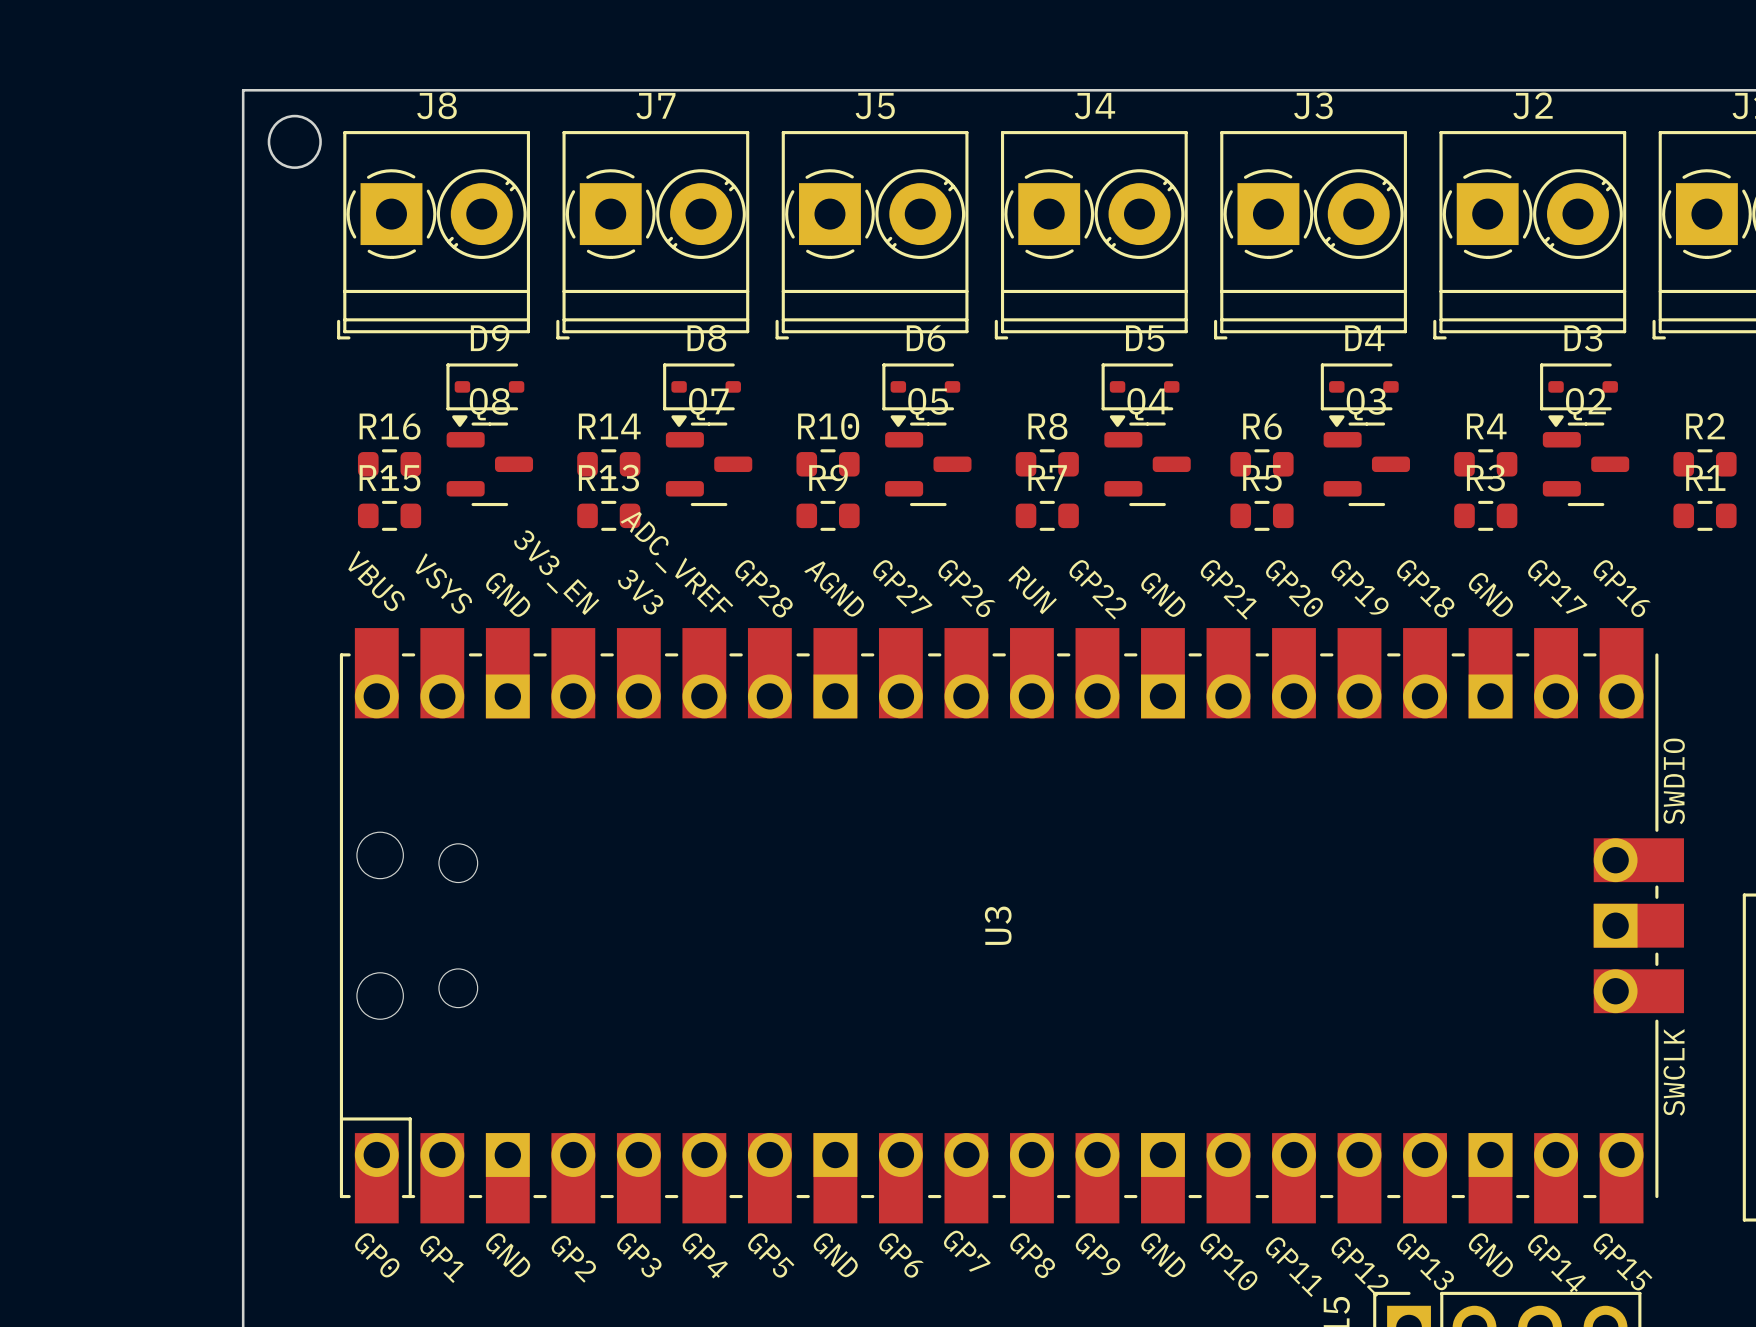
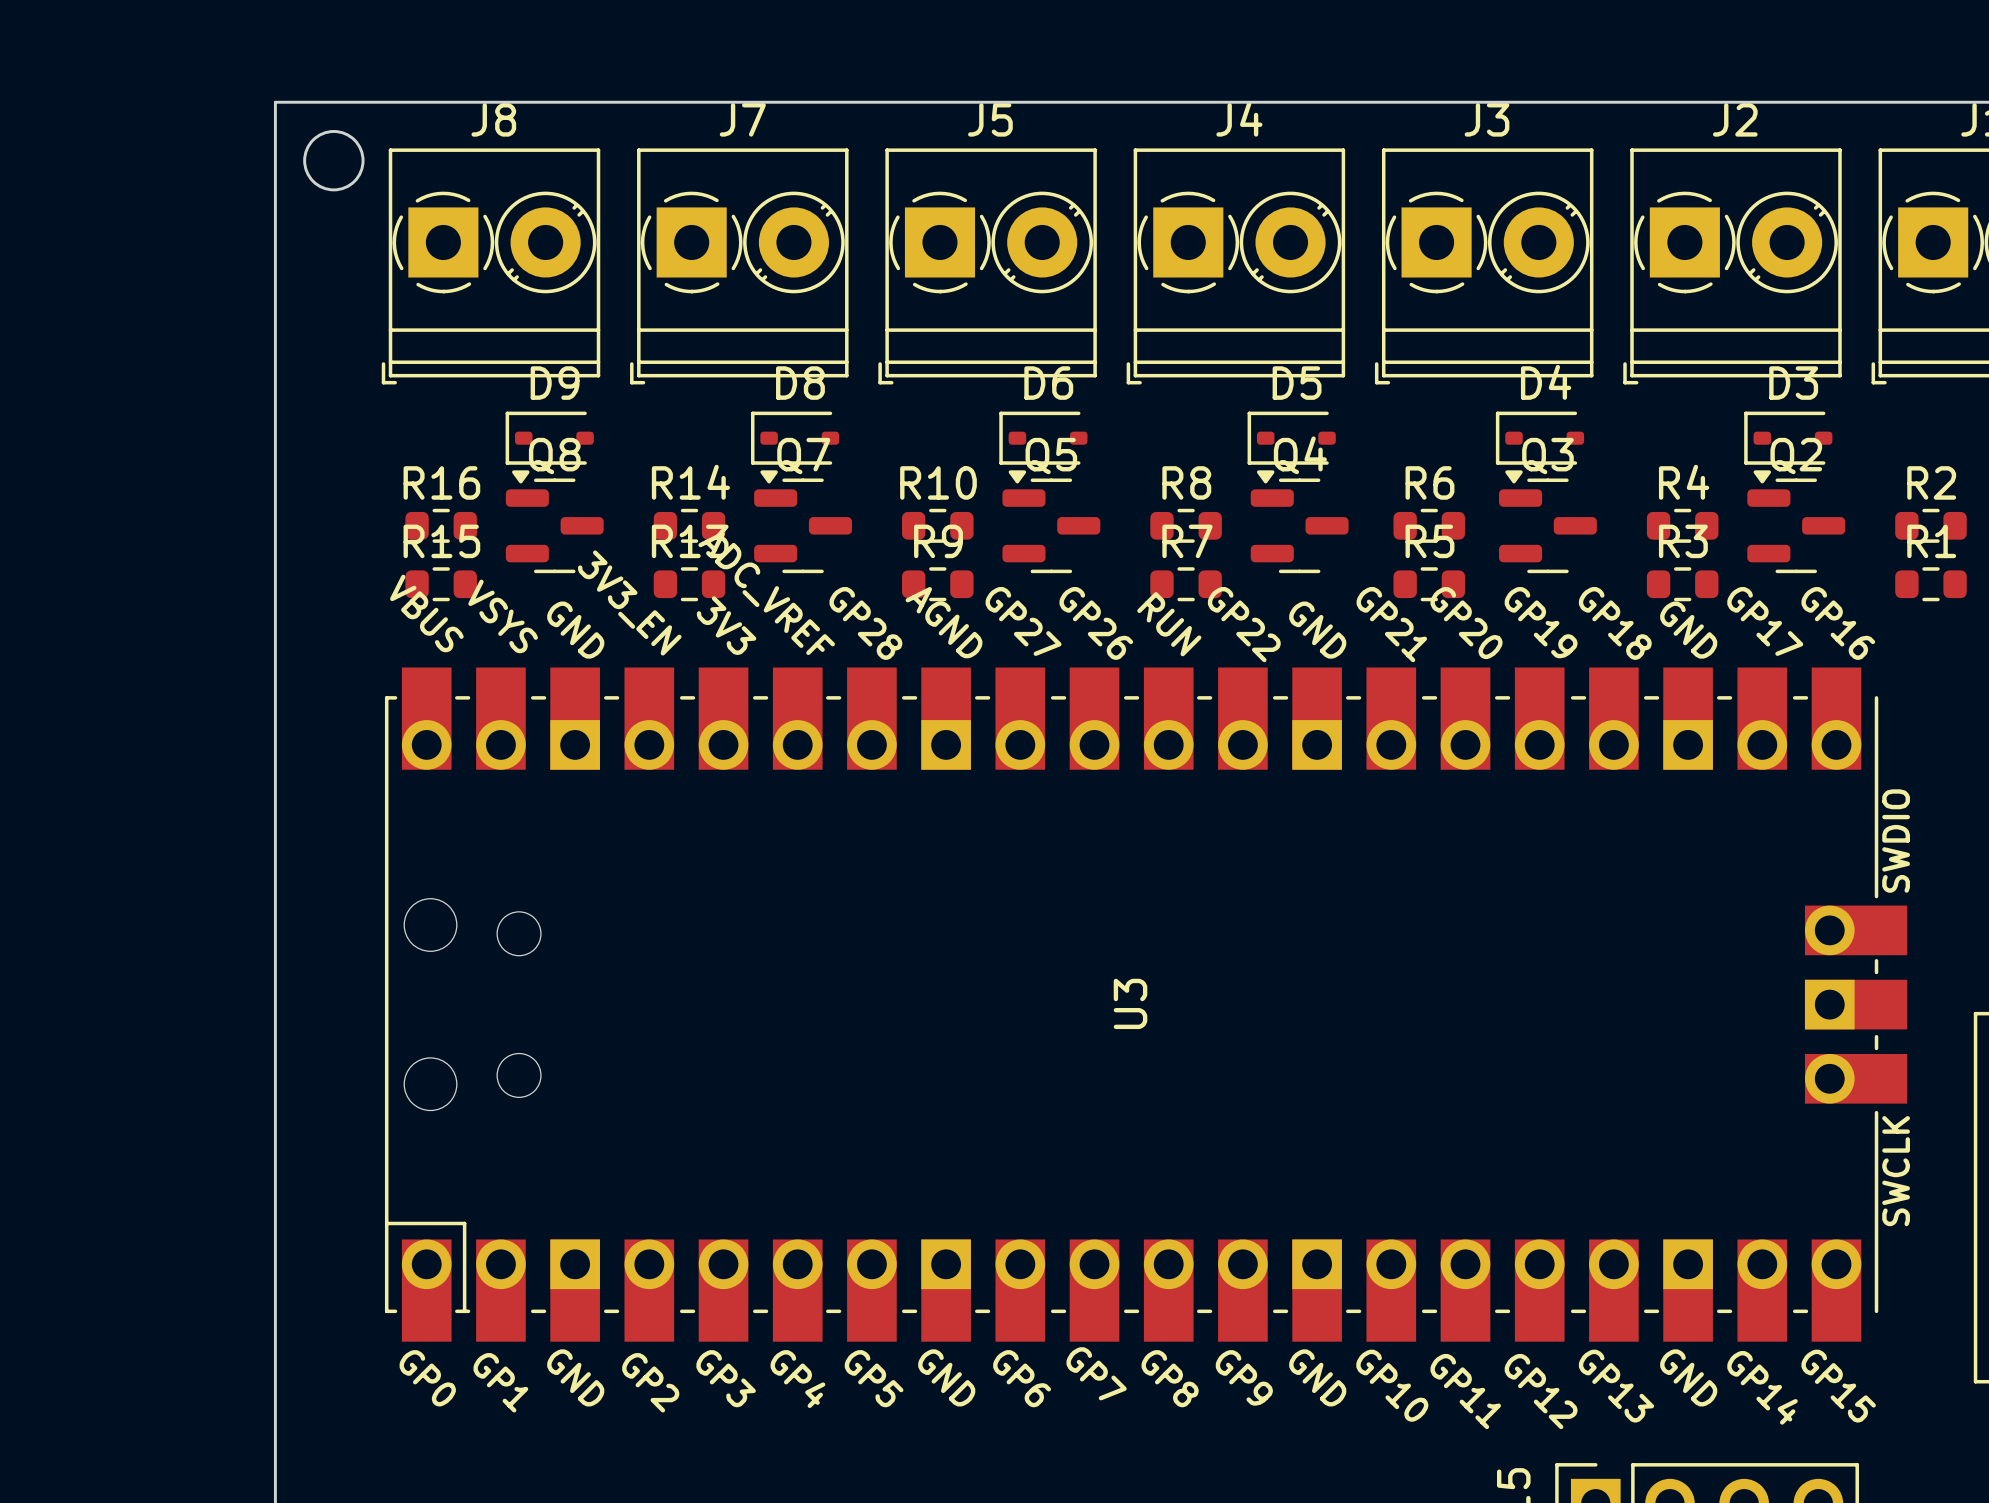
U3 position: (1011, 925) -> (1146, 1004)

